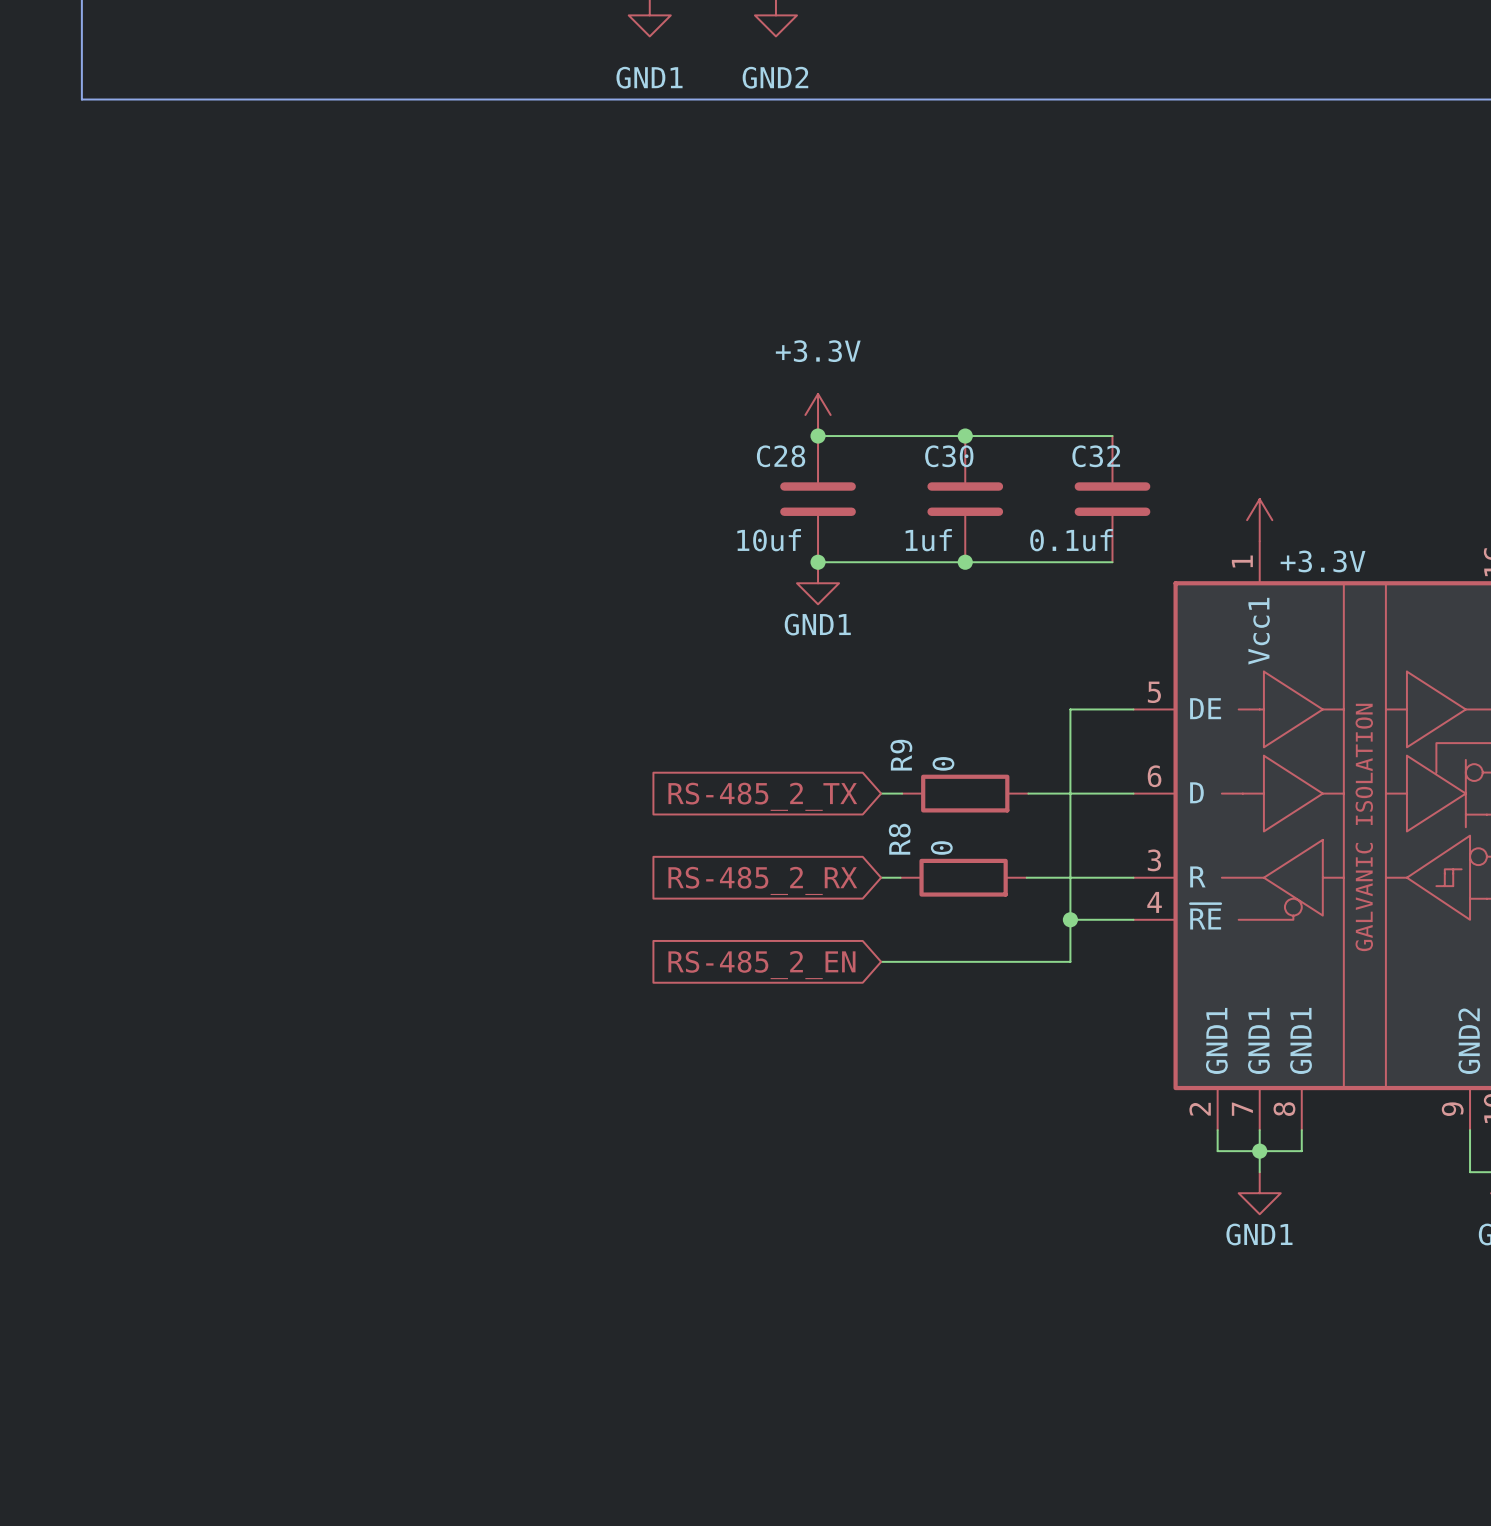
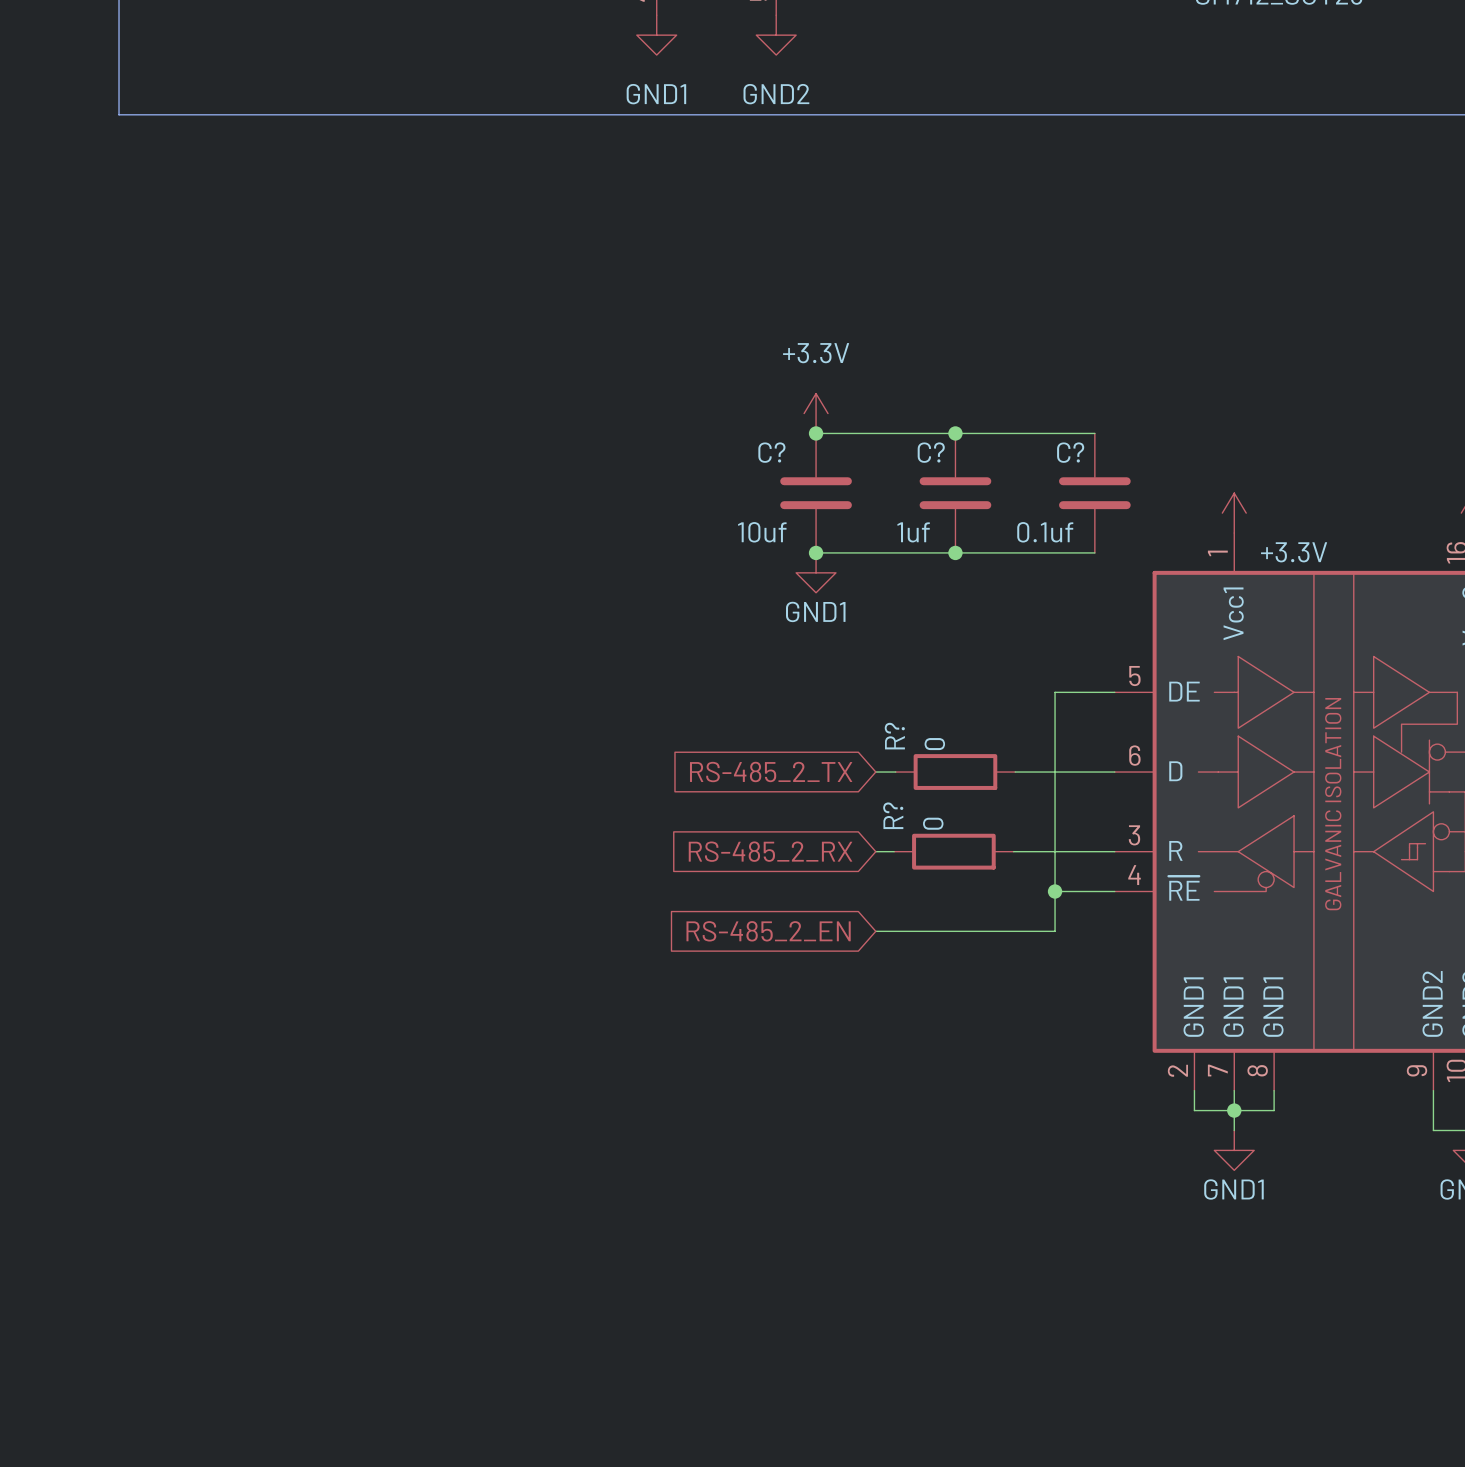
C28 name: C28 (781, 456) -> C? (771, 452)
C30 name: C30 (949, 456) -> C? (931, 452)
C32 name: C32 (1096, 456) -> C? (1070, 452)
R9 name: R9 (901, 755) -> R? (894, 736)
R8 name: R8 (899, 839) -> R? (893, 815)

